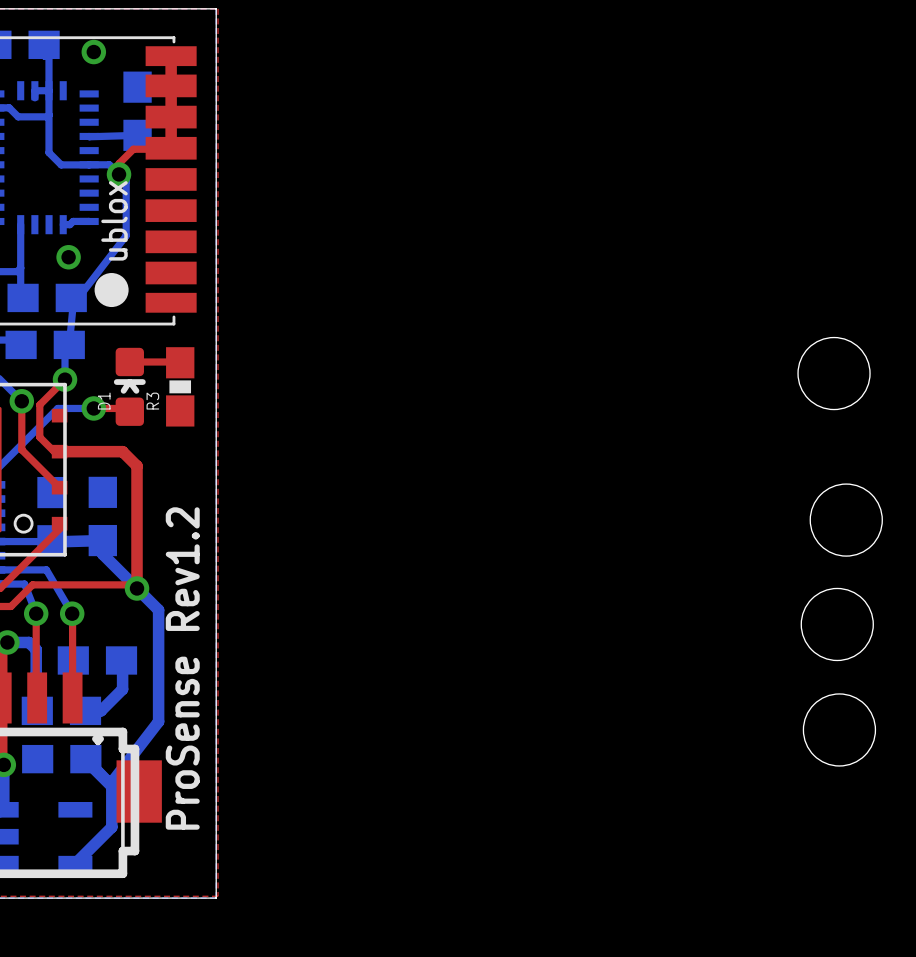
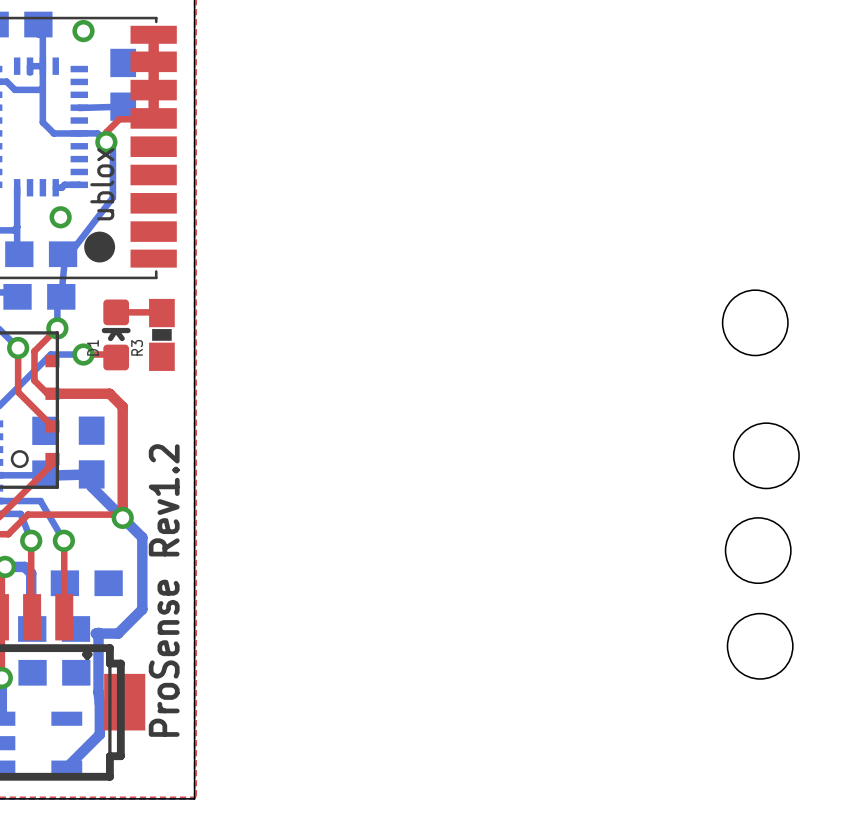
bottom track: (121, 660) (122, 689) (101, 710) (85, 710) -> none
bottom track: (158, 689) (158, 721) (110, 784) (85, 759) (111, 786) (111, 792) -> (142, 609) (118, 633) (95, 633) (98, 632) (98, 692) (99, 703)

